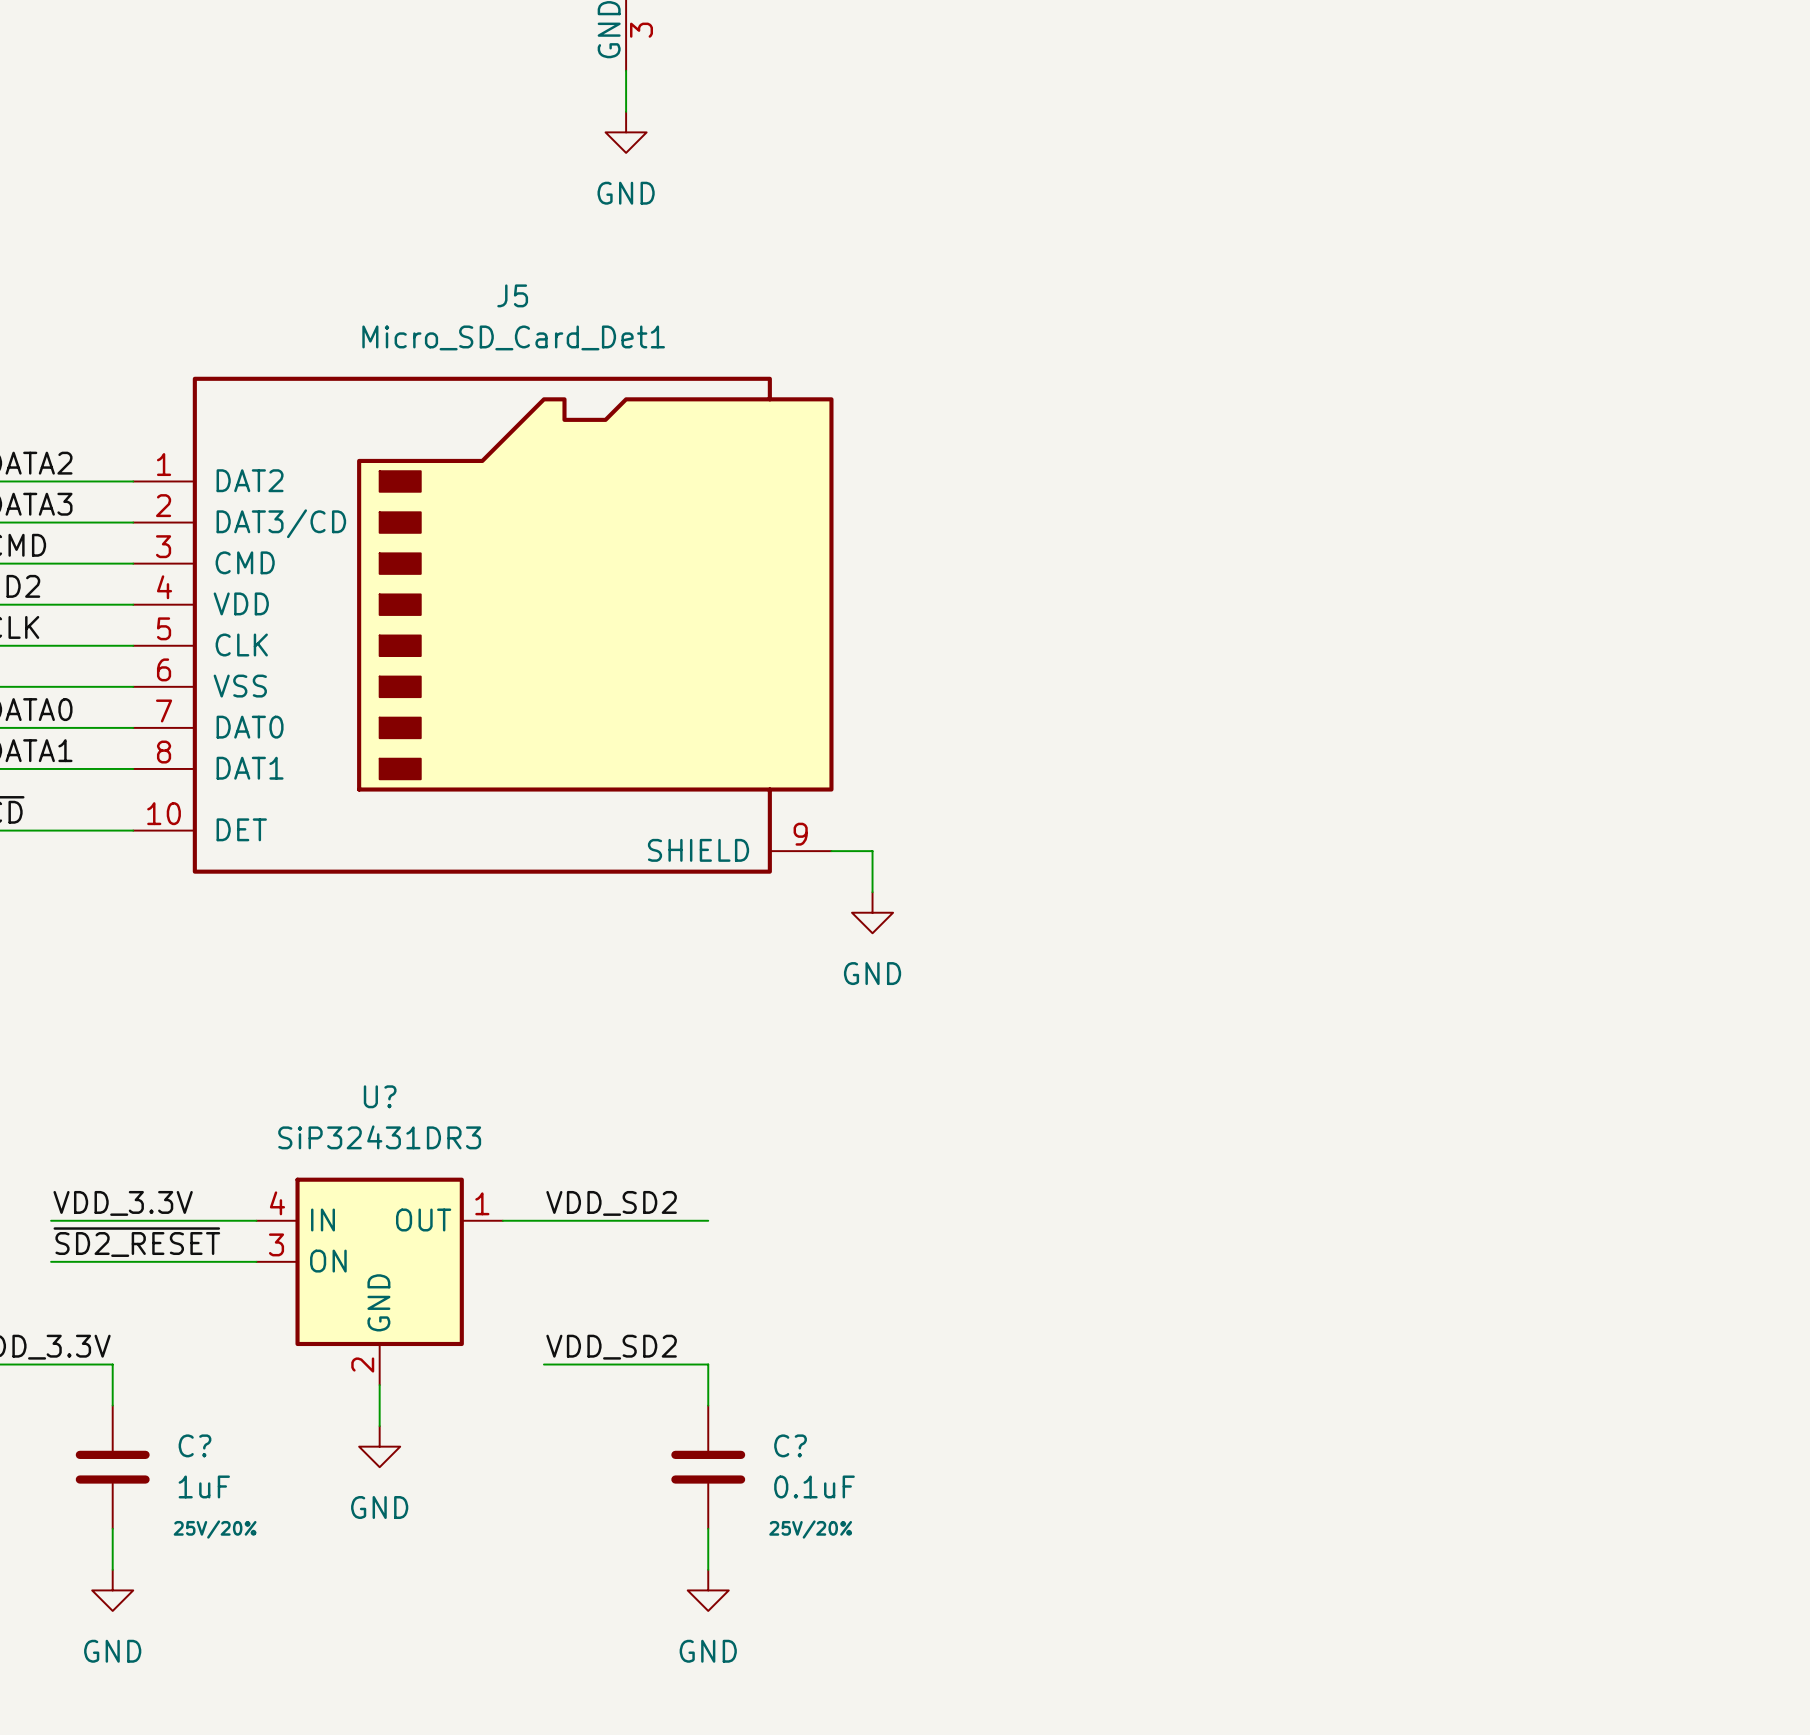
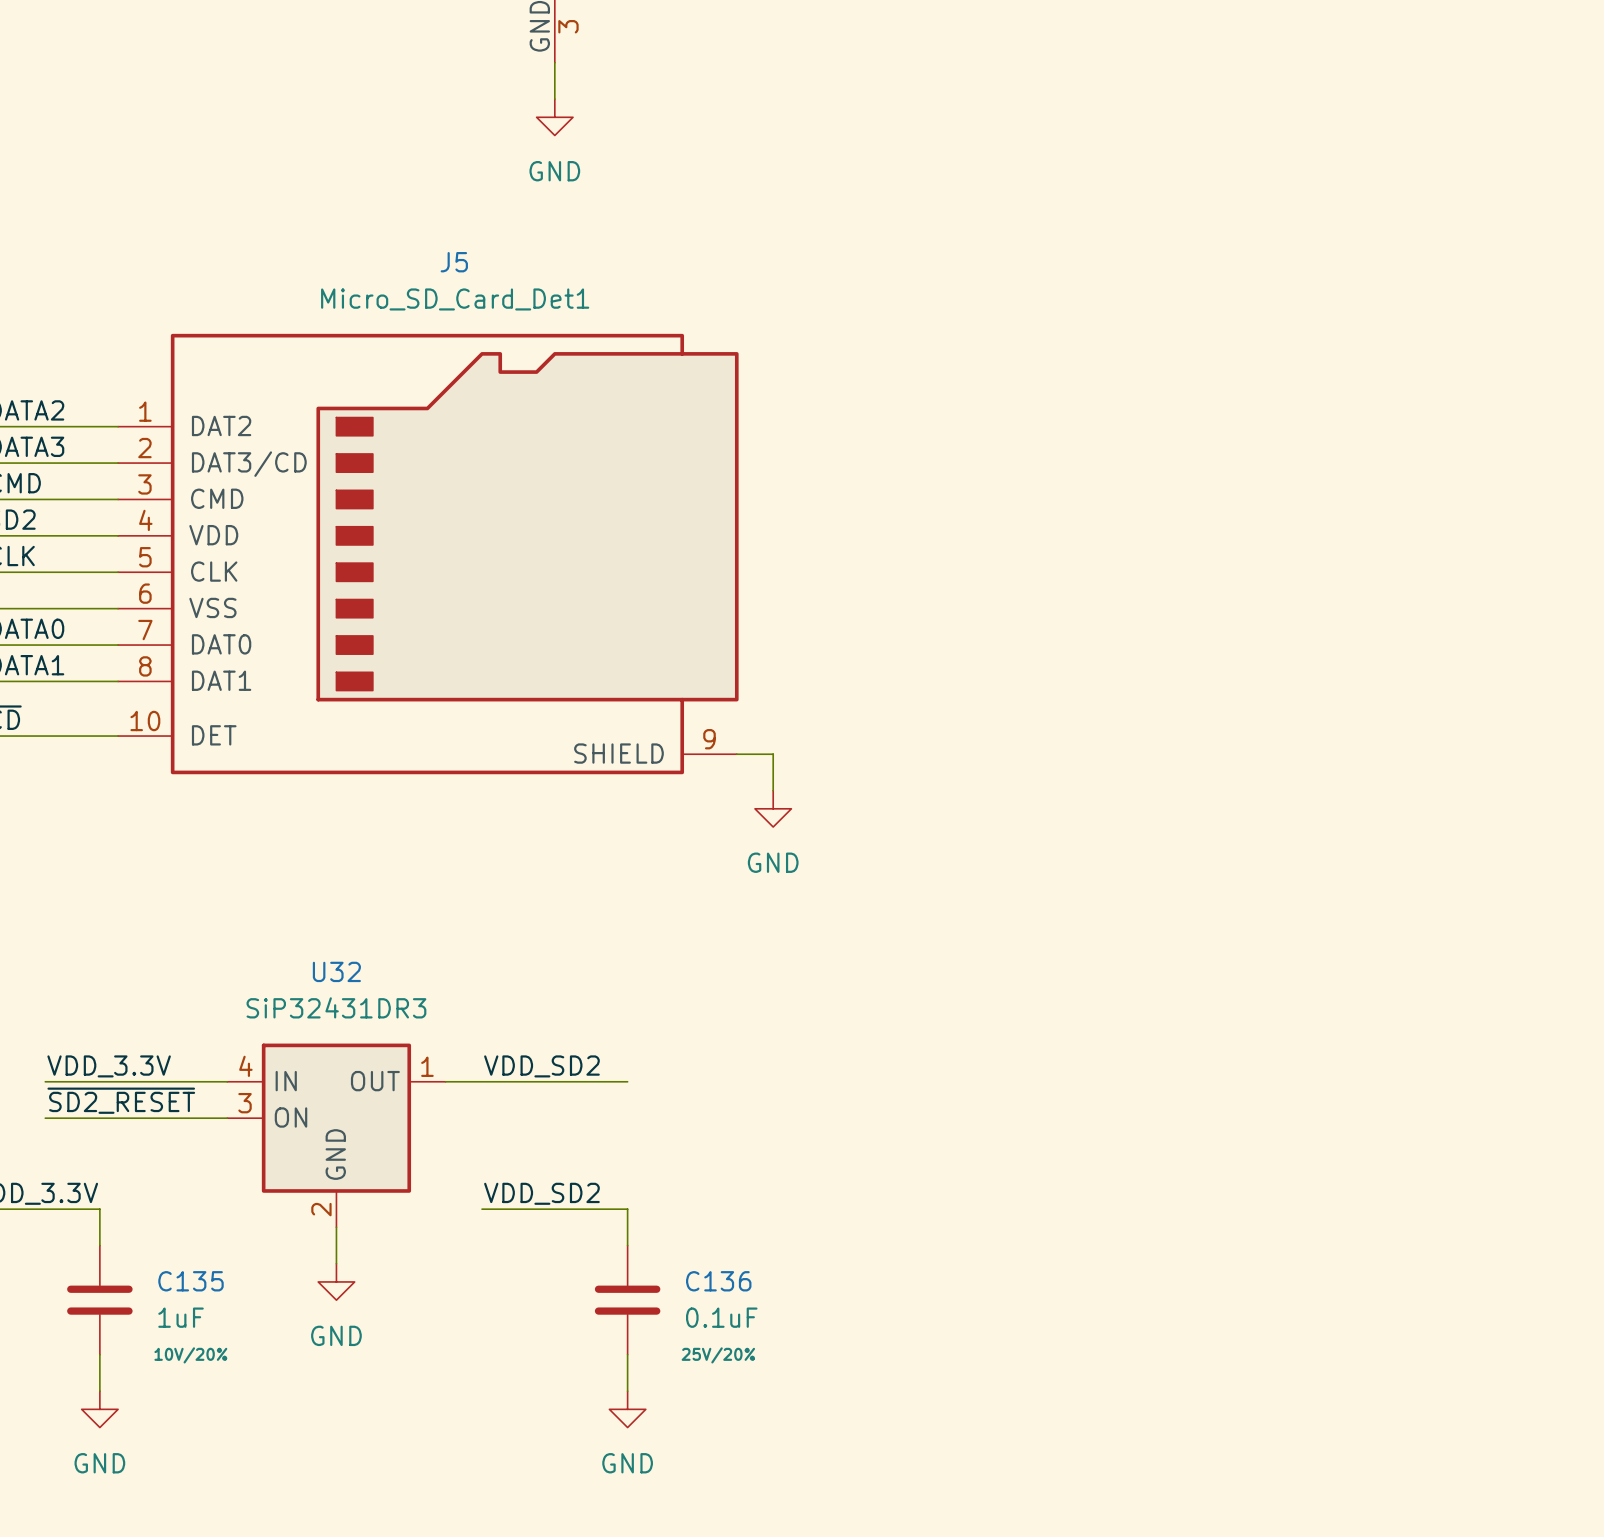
U? name: U? (380, 1096) -> U32 (336, 971)
C? name: C? (195, 1445) -> C135 (191, 1281)
C? name: C? (790, 1445) -> C136 (718, 1281)
C? text: 25V/20% (215, 1529) -> 10V/20% (190, 1355)

